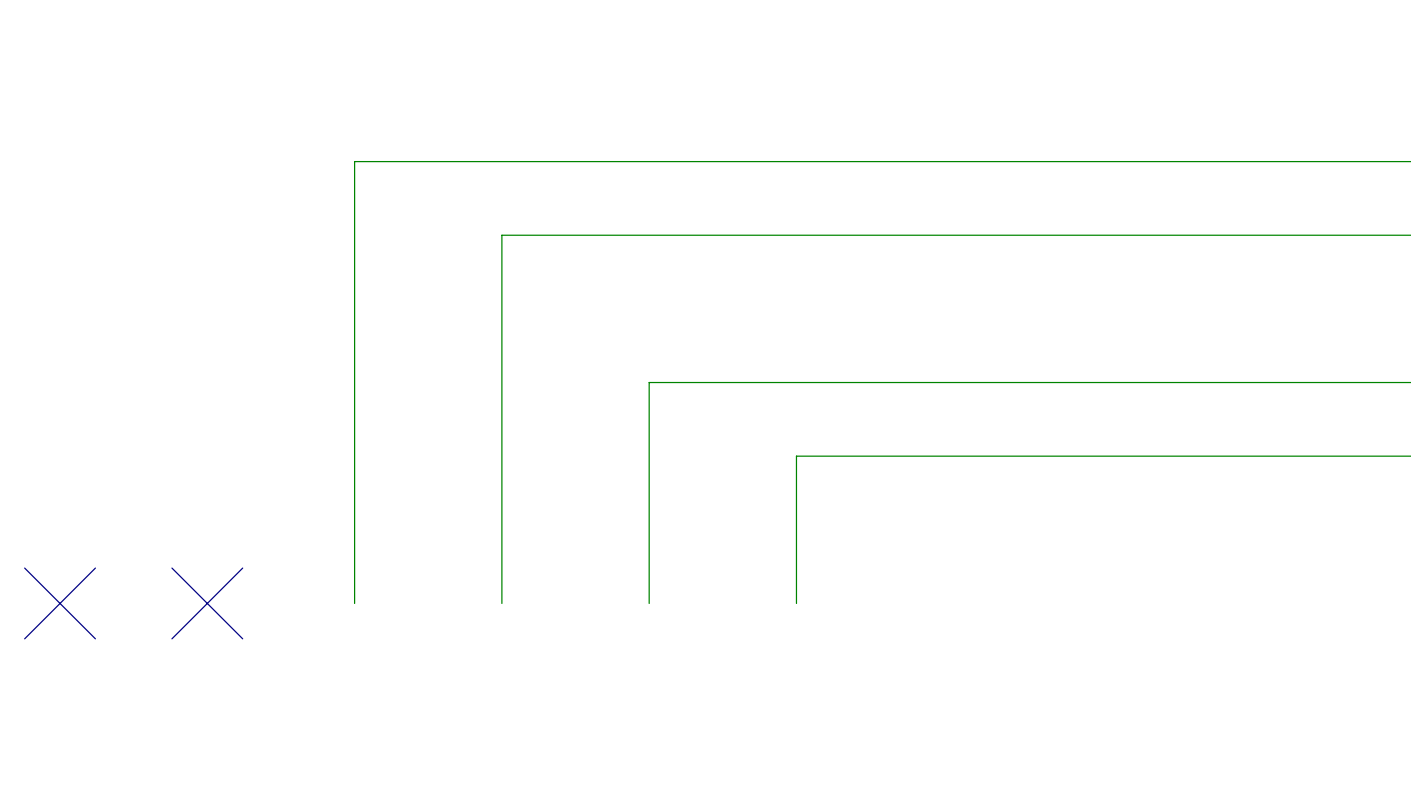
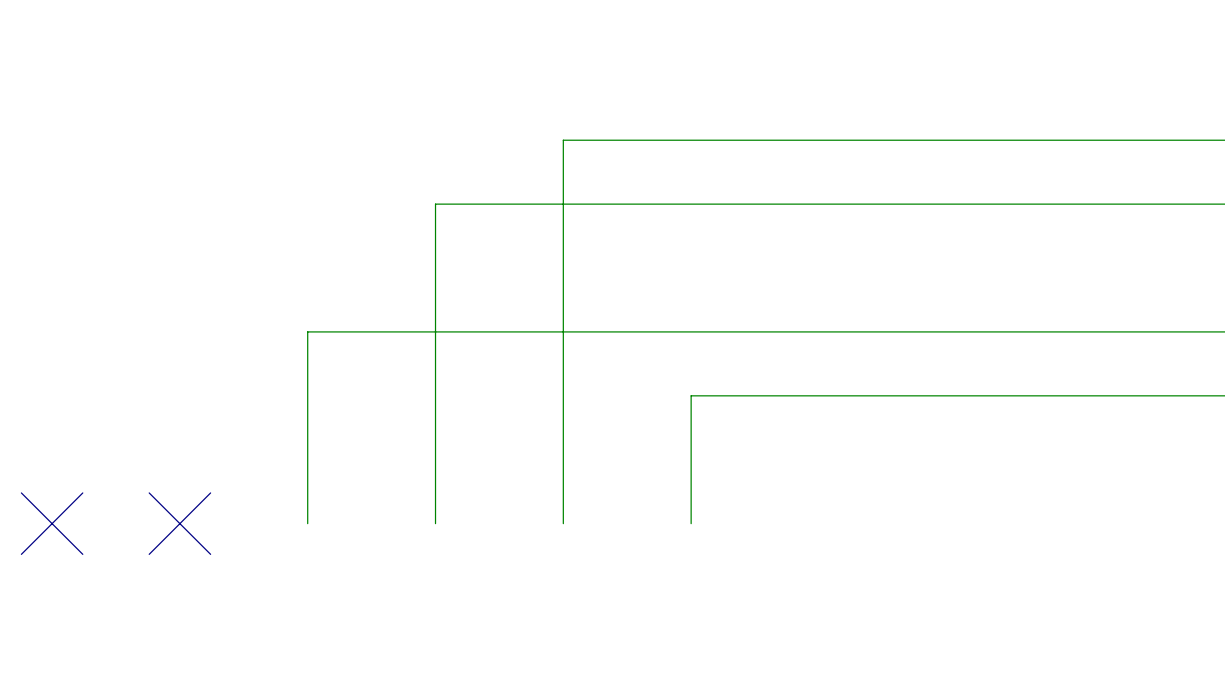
wire: (649, 161) (354, 161) (354, 382) -> (563, 140) (563, 331) (307, 331)

